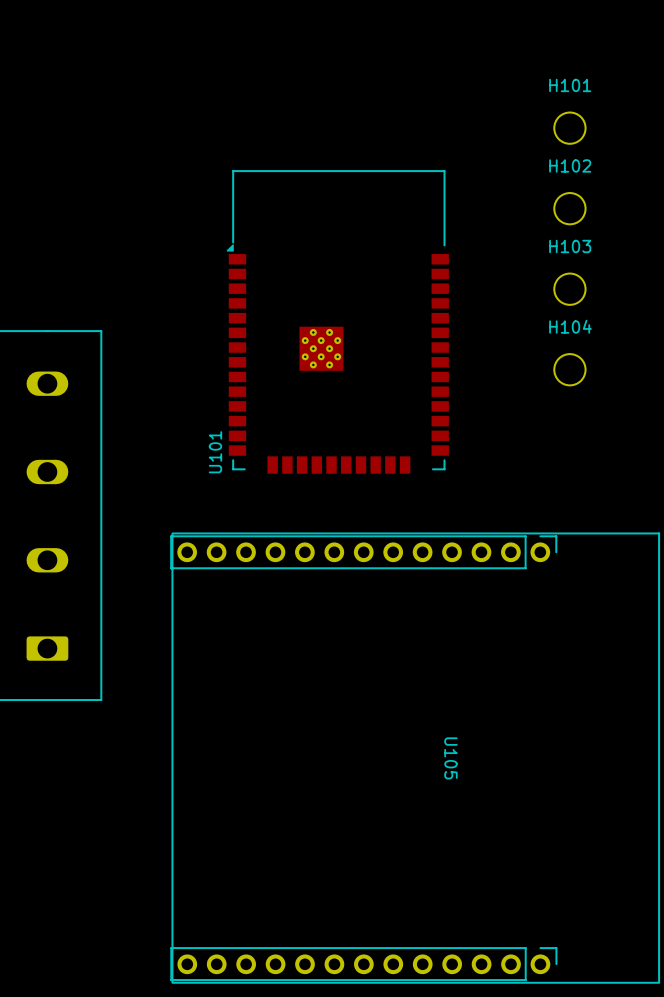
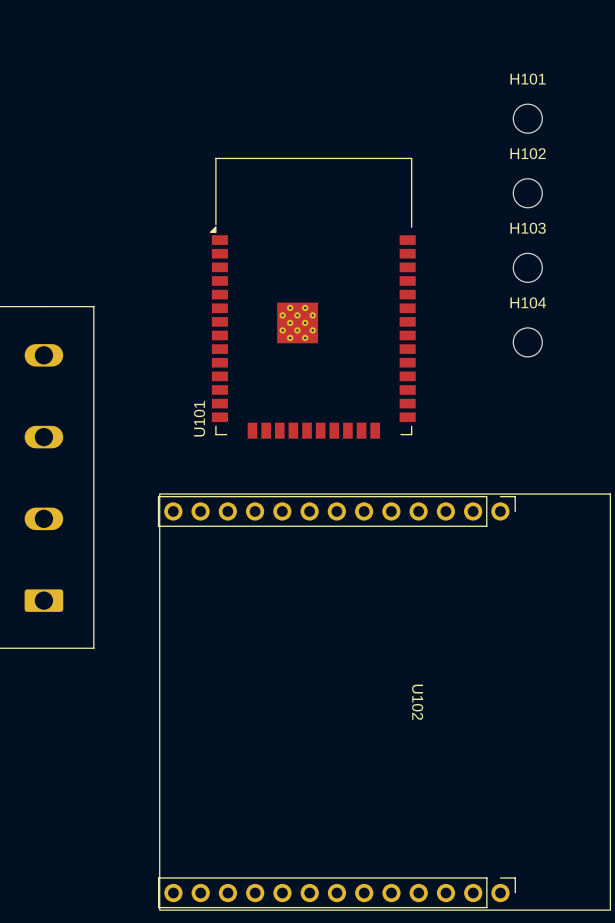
U105 name: U105 (450, 758) -> U102 (417, 702)

